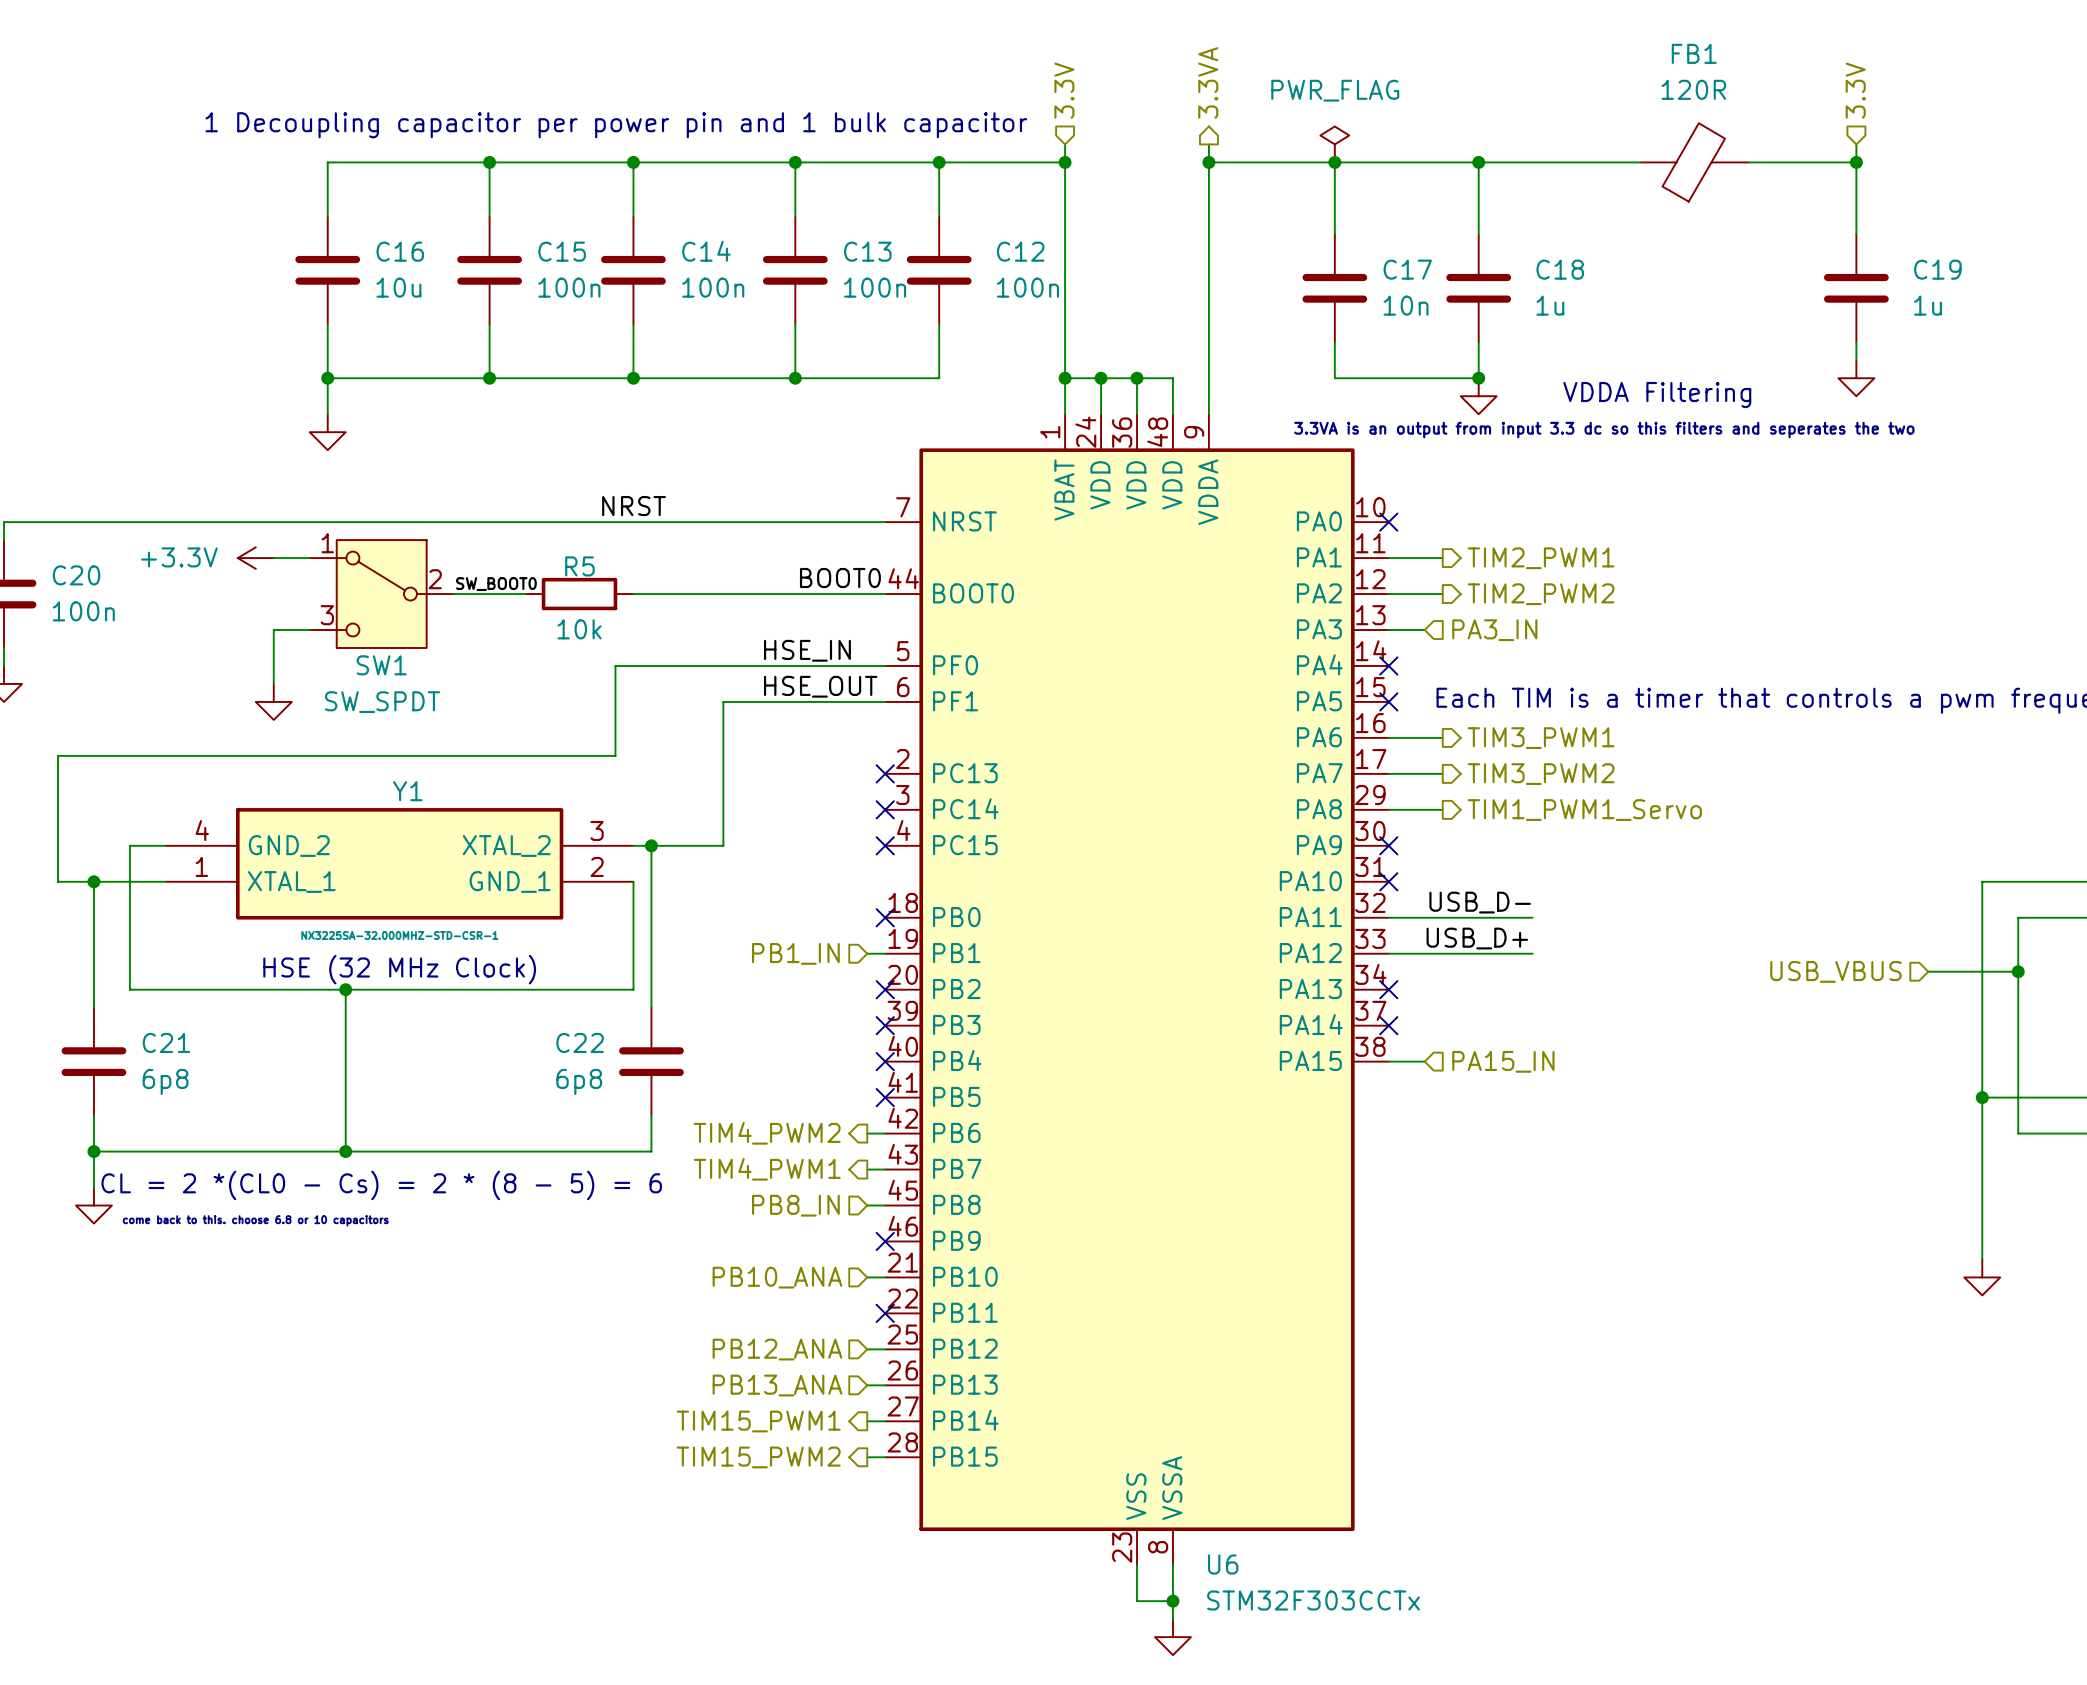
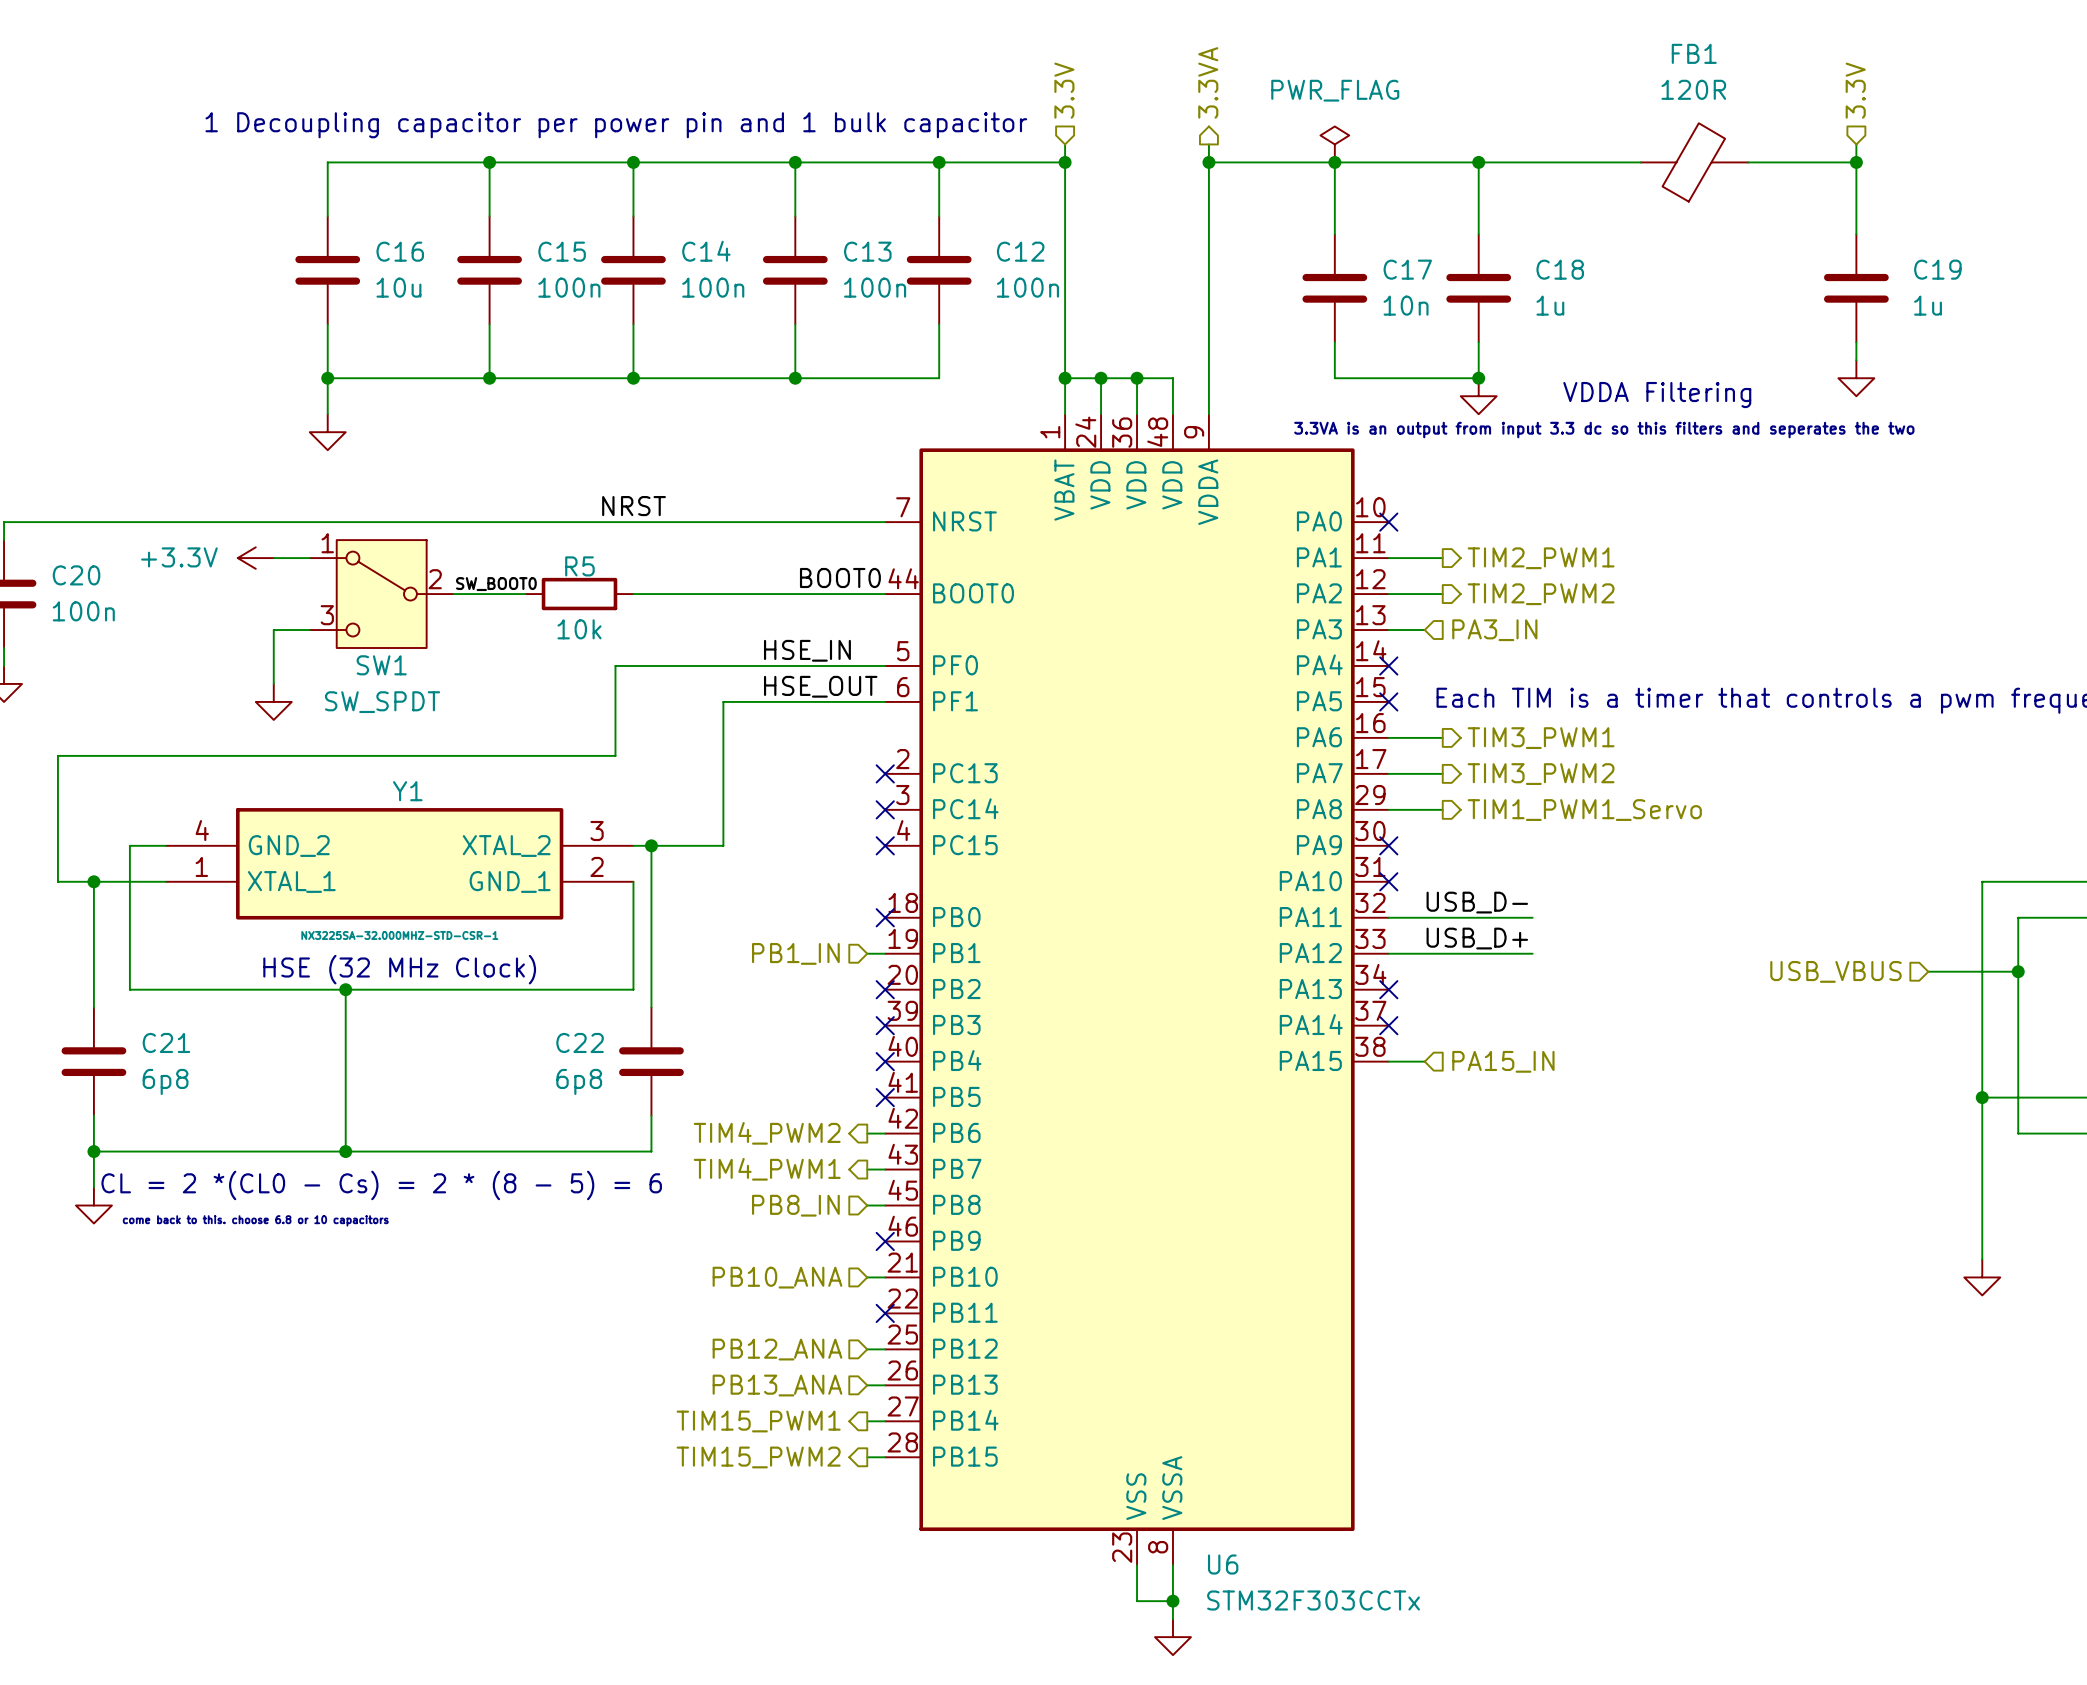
label position: USB_D- (1480, 902) -> USB_D- (1477, 902)

